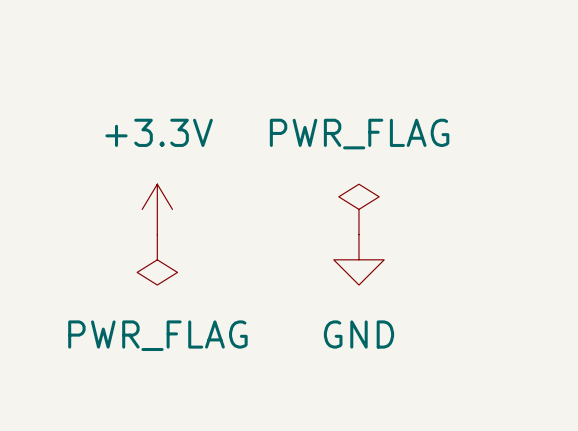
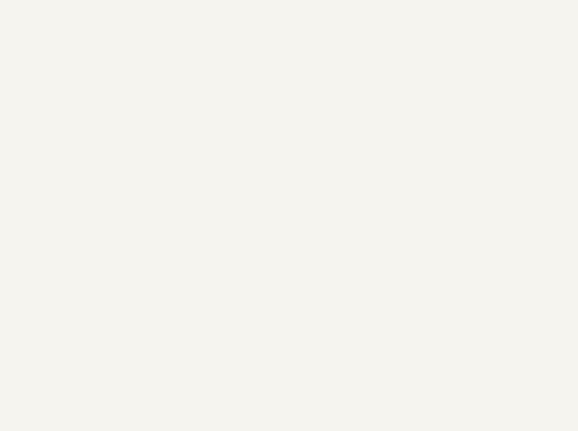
power symbol: +3.3V (157, 209) -> none
power symbol: PWR_FLAG (358, 209) -> none
power symbol: PWR_FLAG (157, 259) -> none
power symbol: GND (358, 259) -> none

